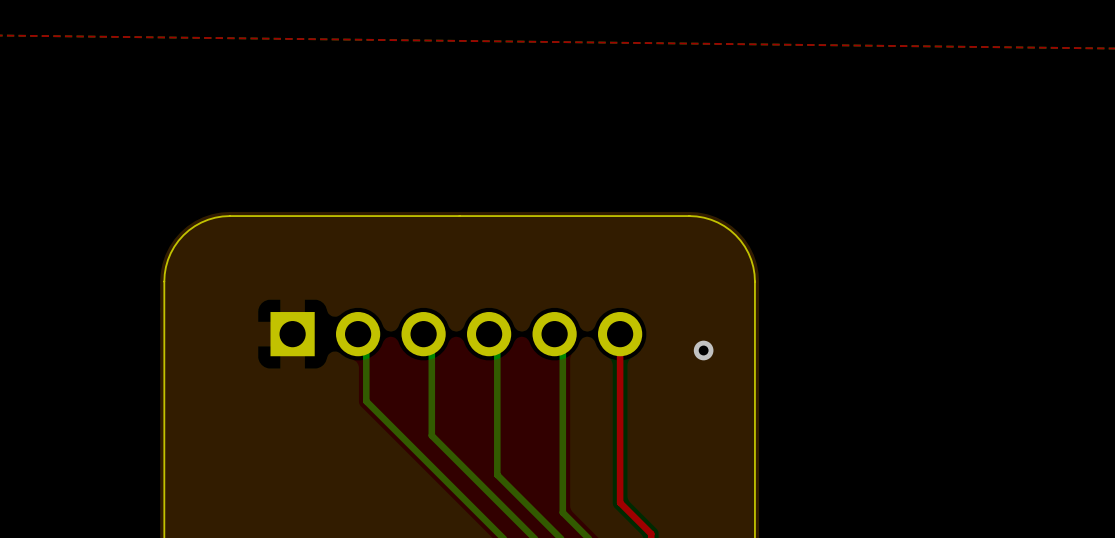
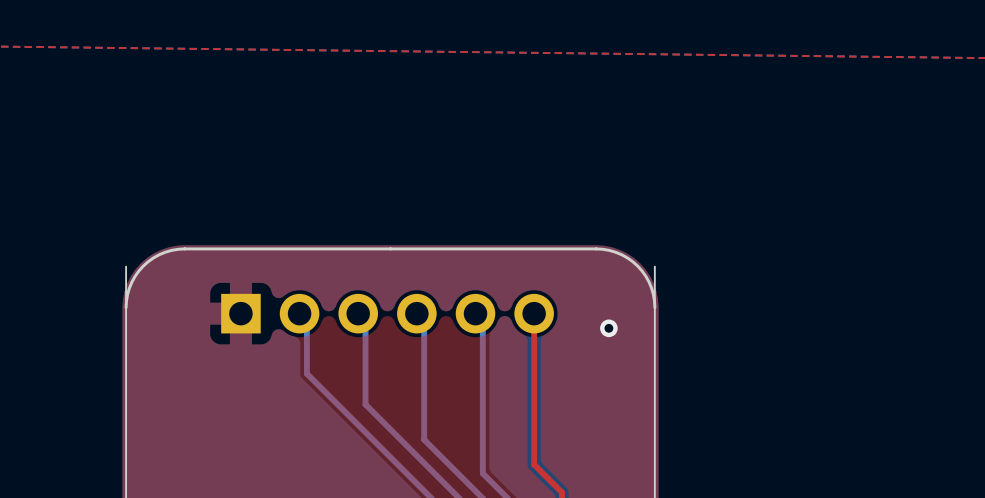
board edge: (164, 281) (167, 259) (174, 246) (183, 235) (201, 222) (215, 217) (229, 216) (696, 216) (717, 222) (735, 235) (748, 253) (753, 266) (754, 281) -> (126, 307) (129, 288) (143, 266) (165, 252) (184, 248) (602, 249) (621, 254) (642, 270) (651, 288) (654, 307)

